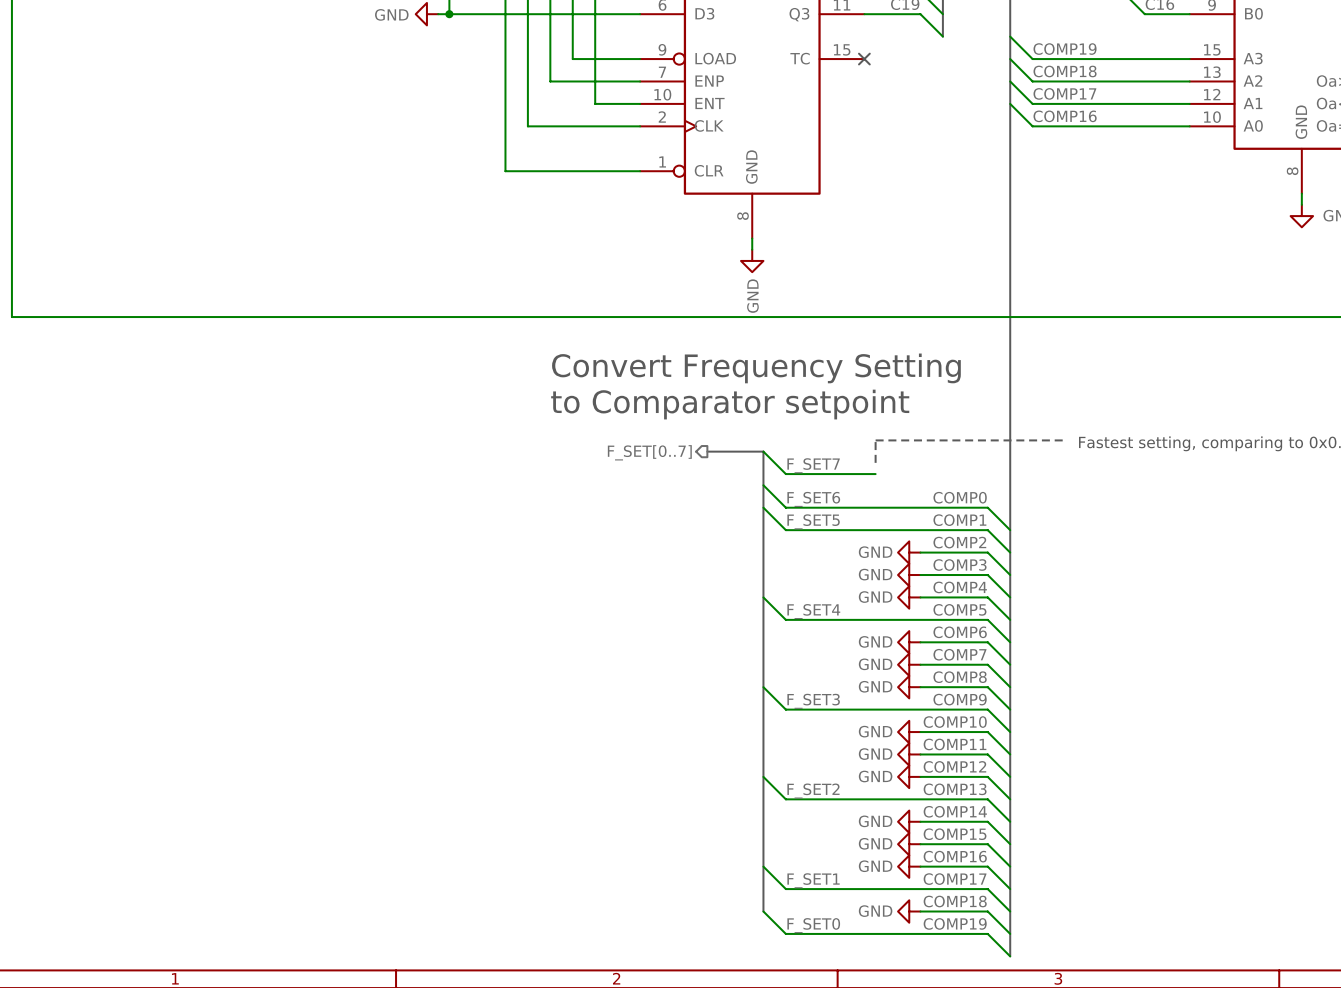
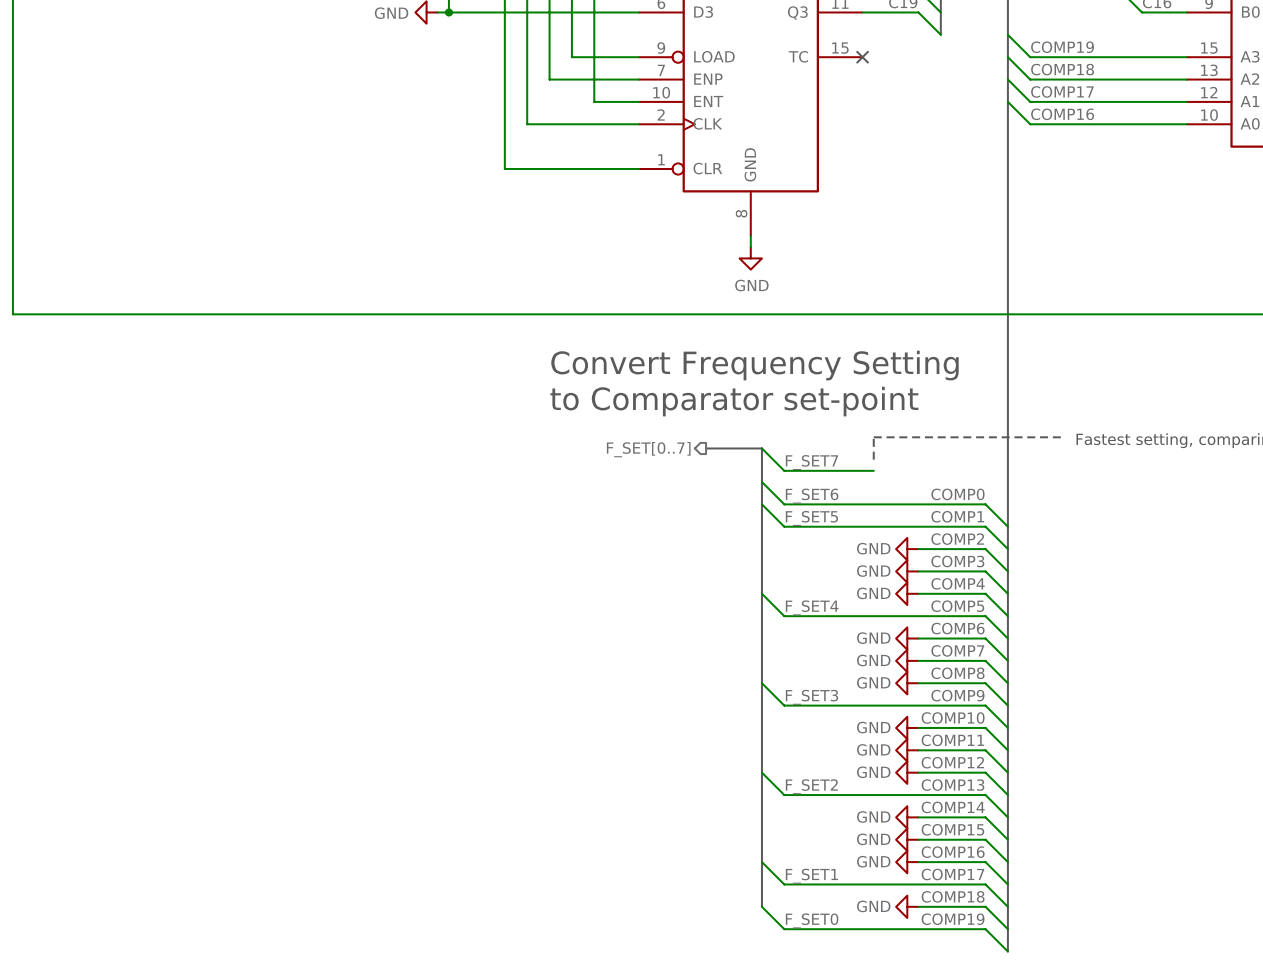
power symbol text rotation: 0° (752, 296) -> 90° clockwise (751, 285)
text: to Comparator setpoint (730, 404) -> to Comparator set-point (734, 401)

